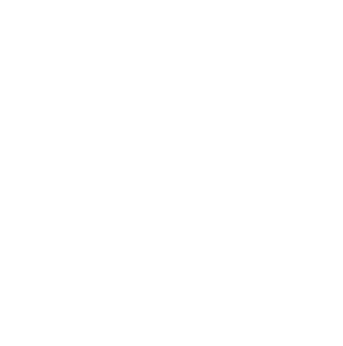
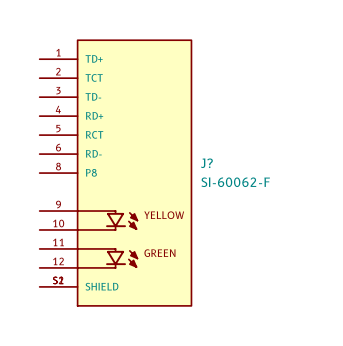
J?: none -> SI-60062-F (115, 173)

